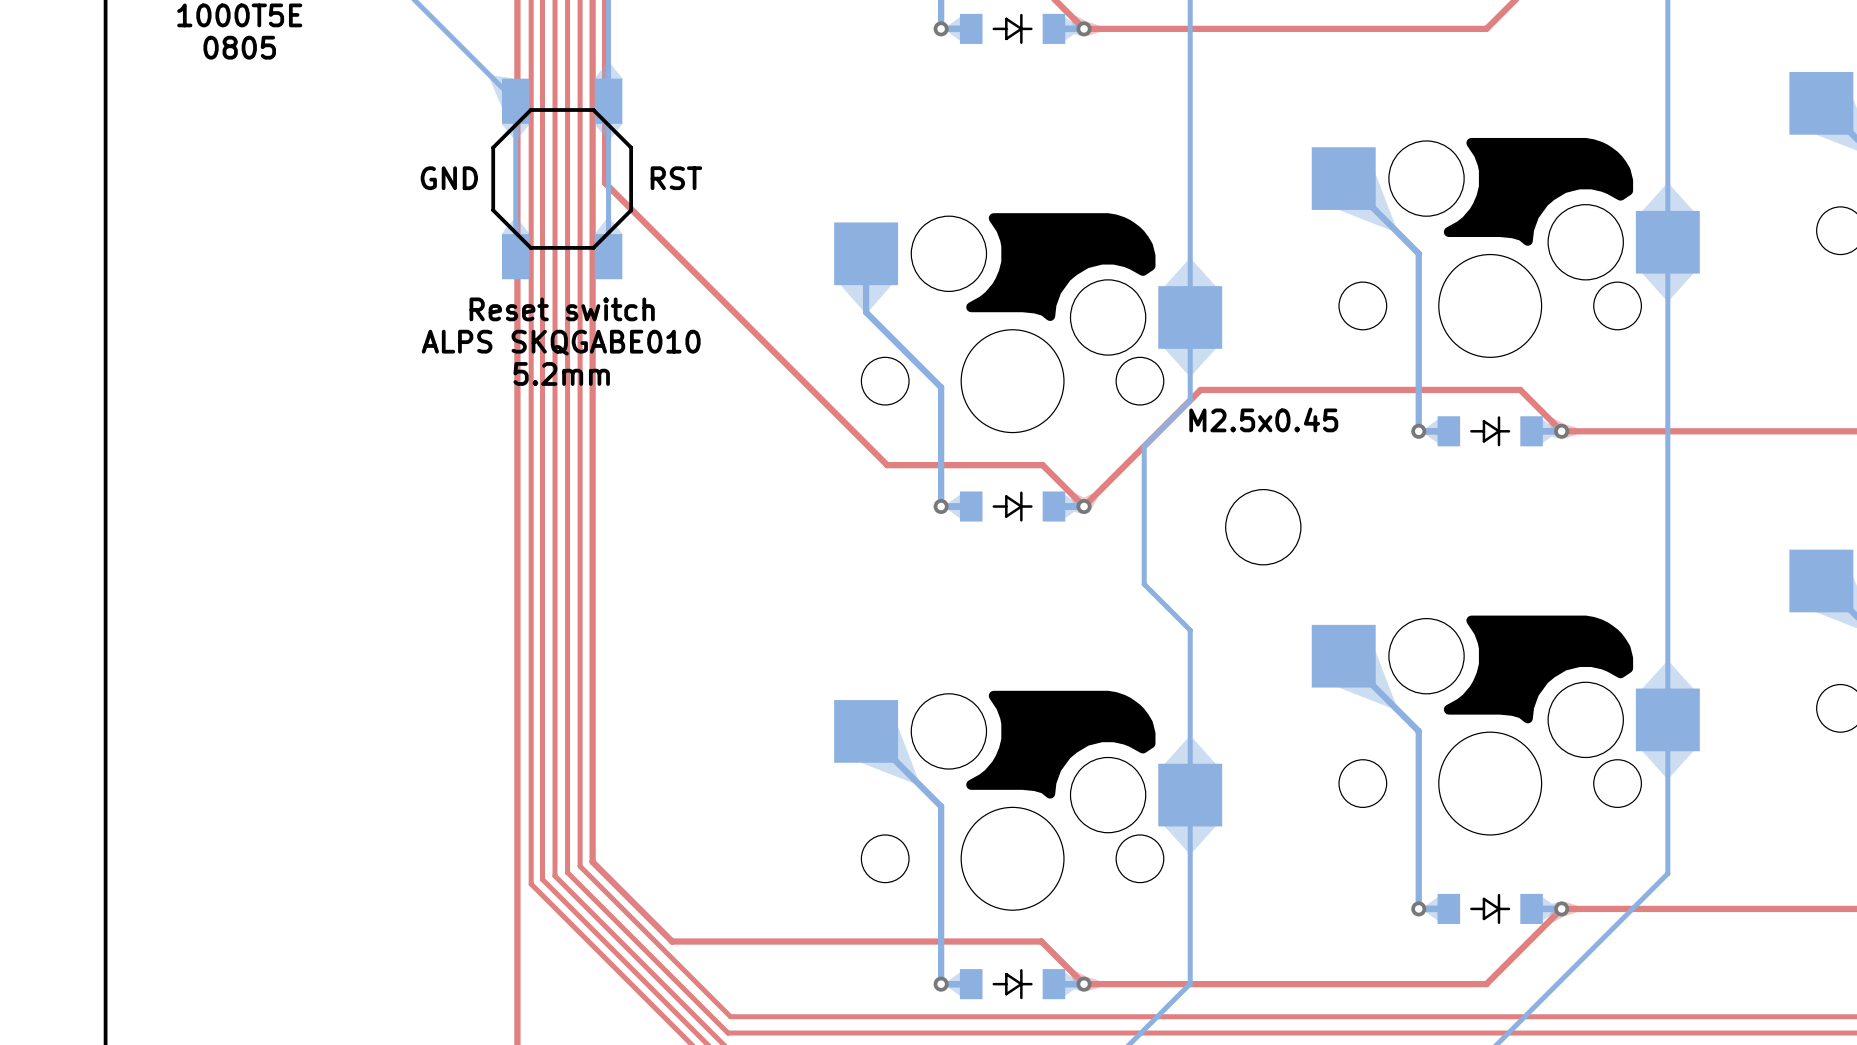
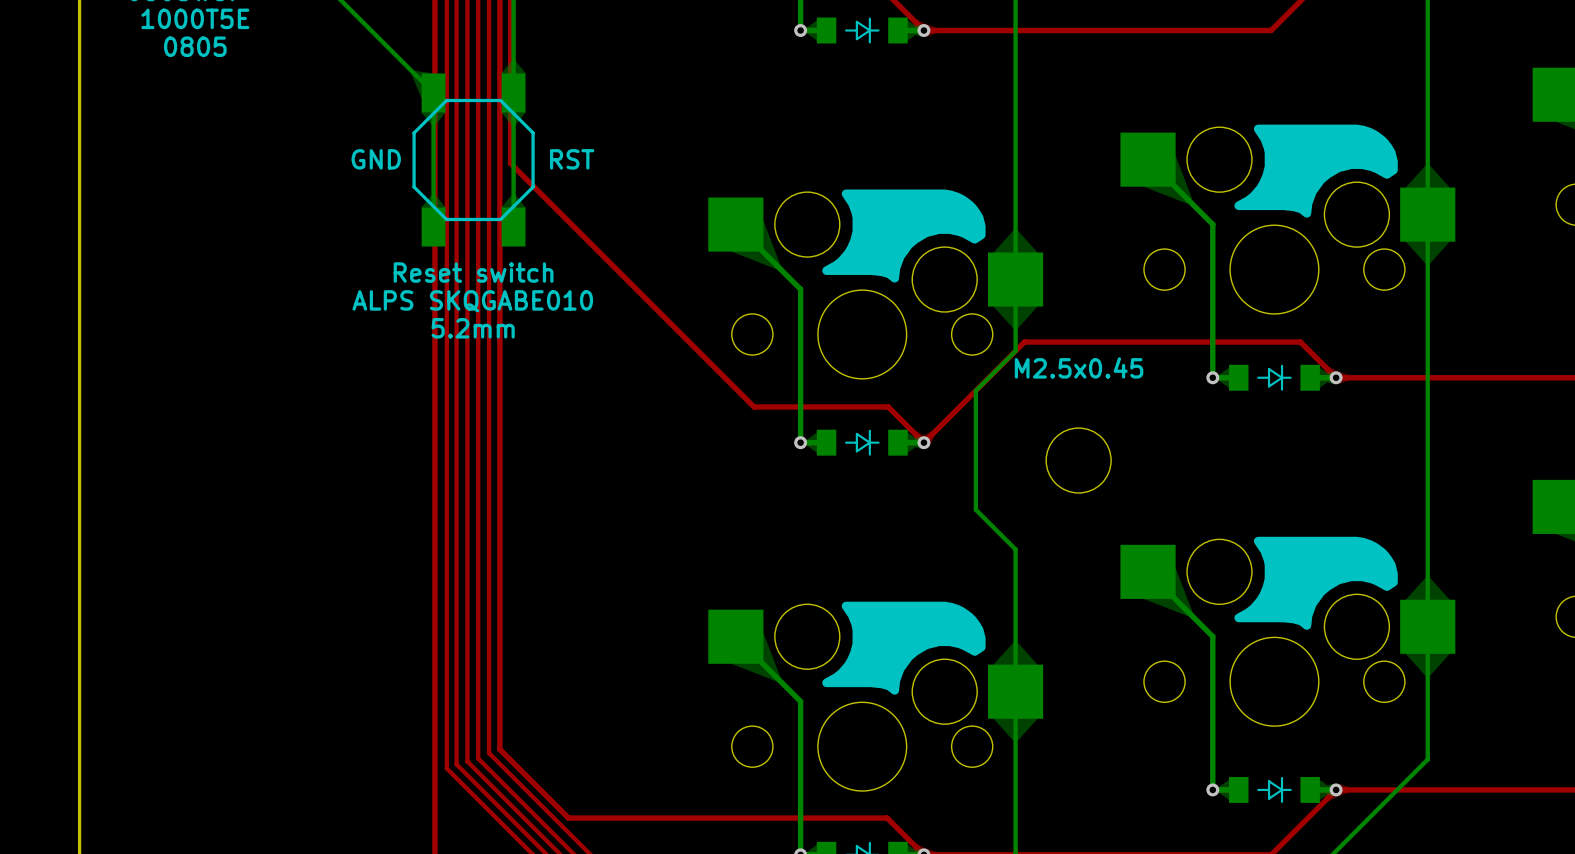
bottom track: (866, 253) (866, 312) (941, 387) -> (735, 224) (800, 289) (800, 339)

